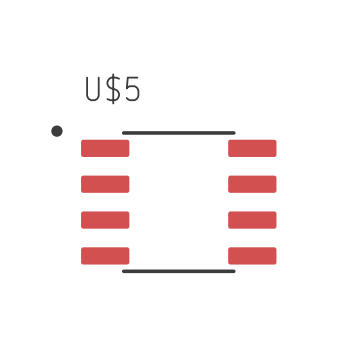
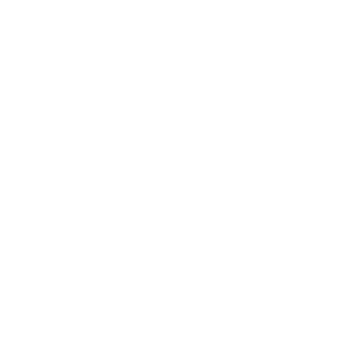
U$5: (163, 199) -> none

